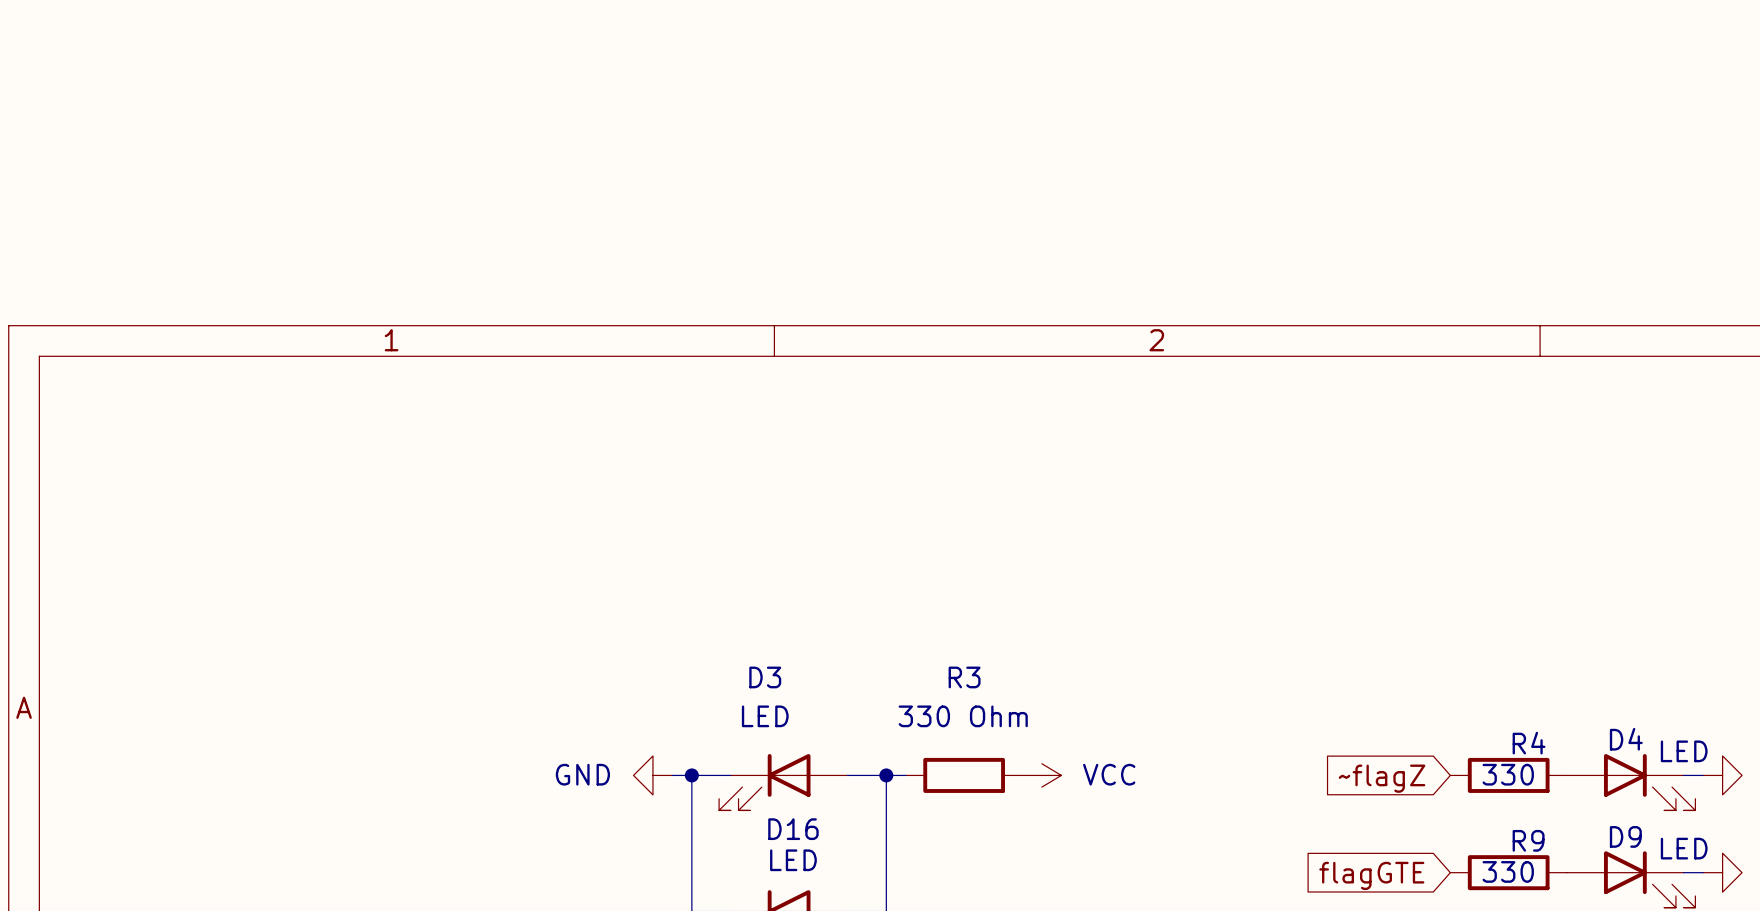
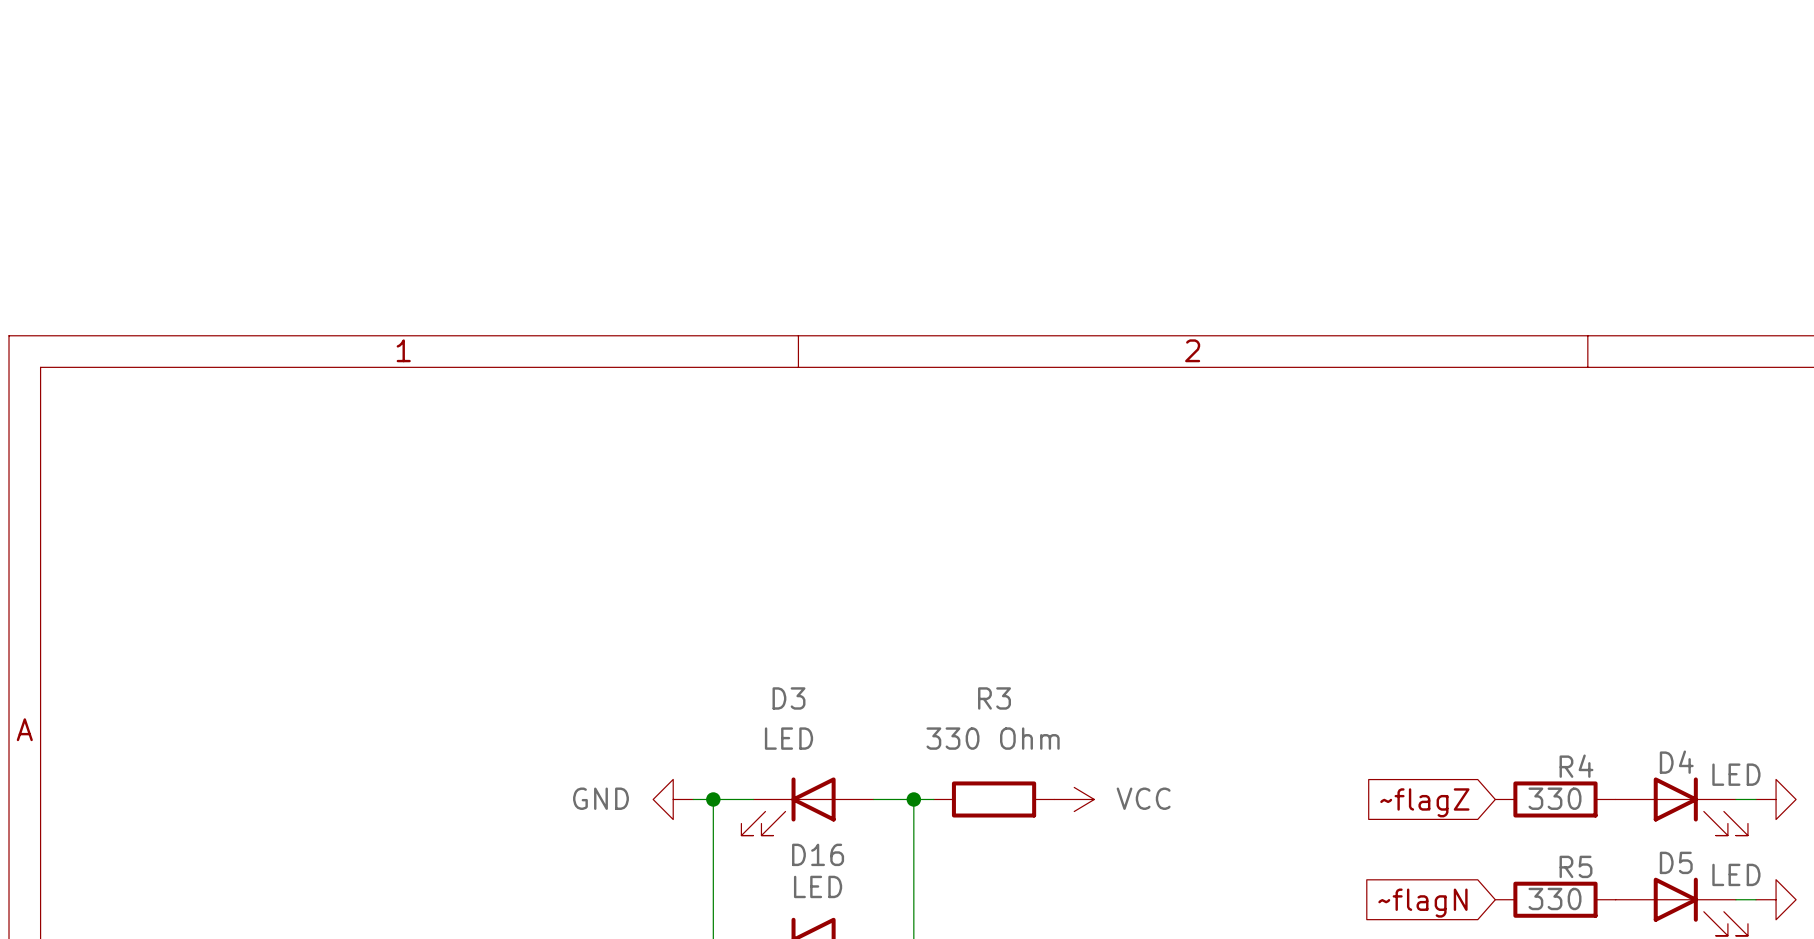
D9 name: D9 (1625, 836) -> D5 (1676, 862)
R9 name: R9 (1528, 840) -> R5 (1576, 866)
global label: flagGTE (1371, 875) -> ~flagN (1422, 903)

